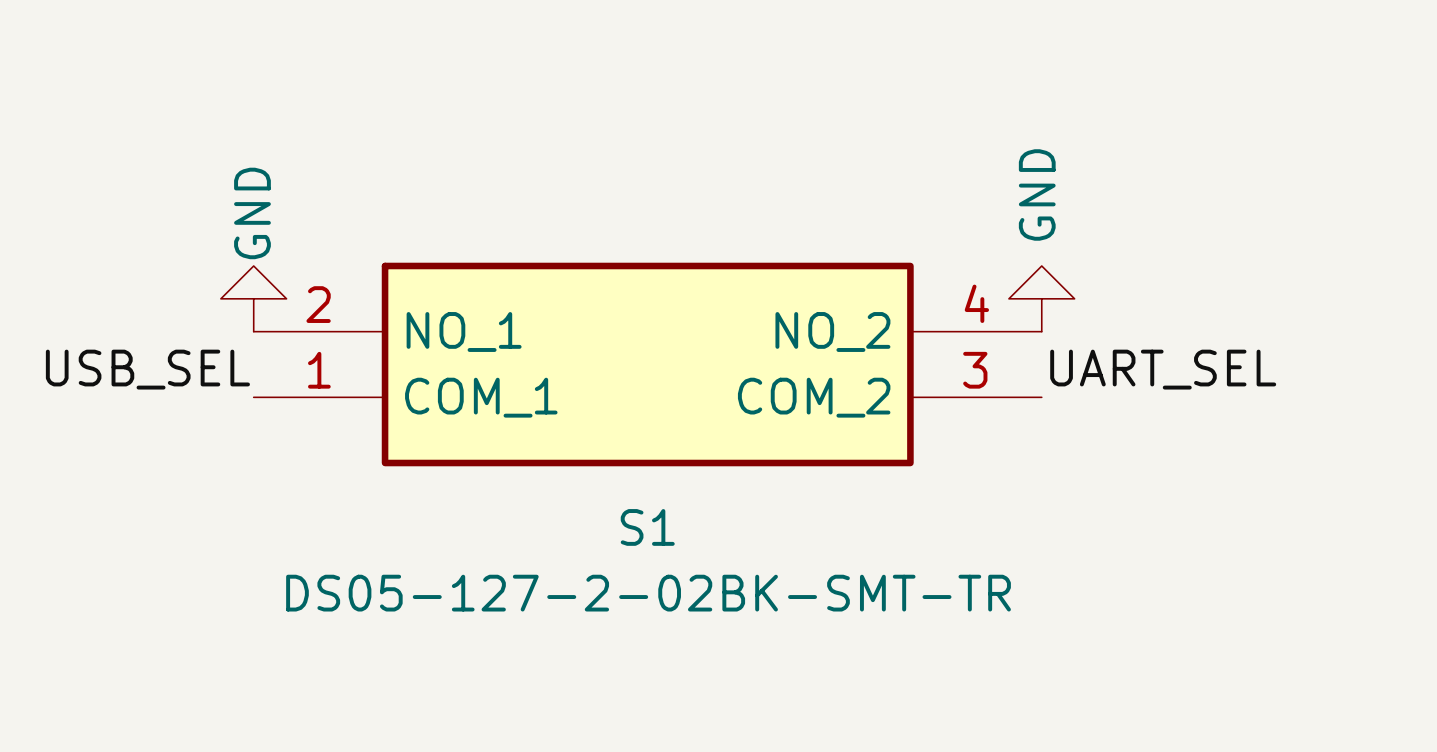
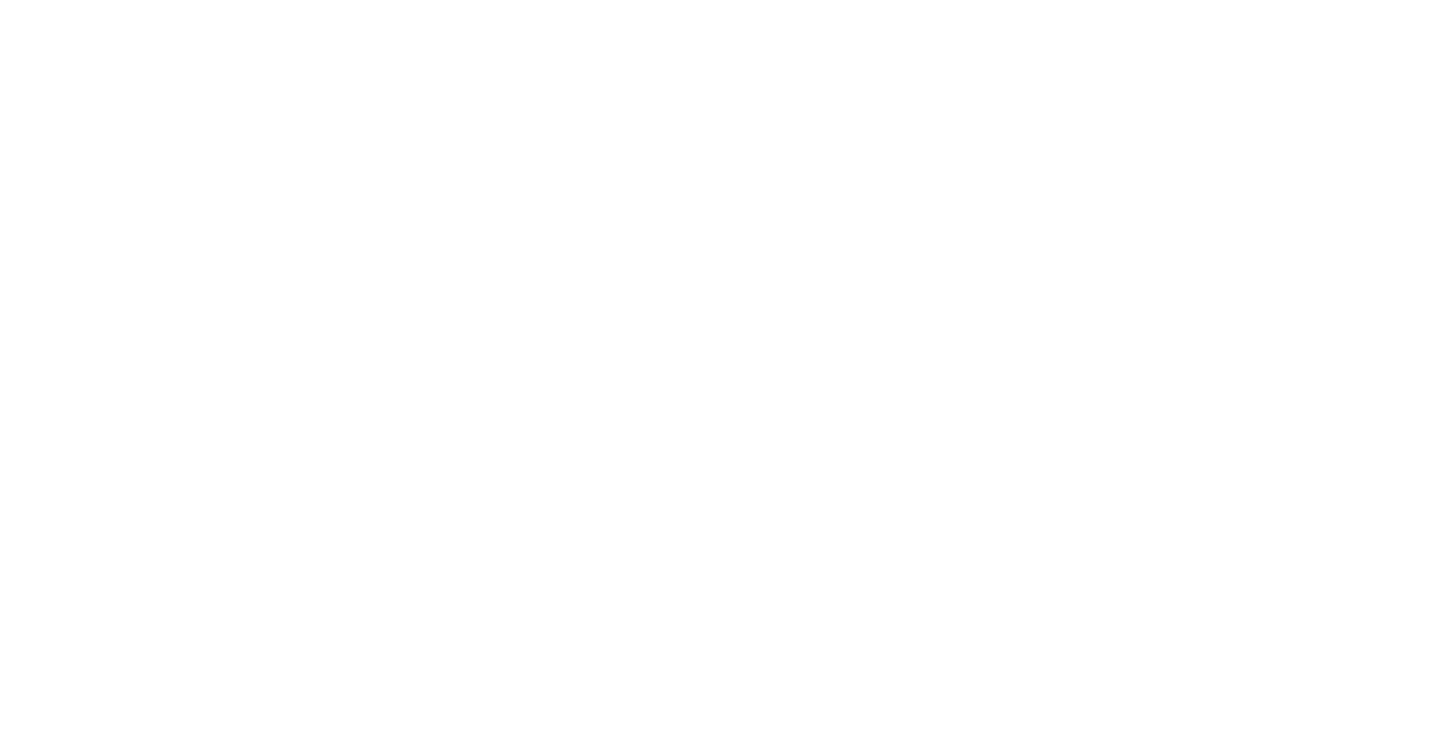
power symbol: GND (253, 298) -> none
power symbol: GND (1041, 298) -> none
S1: DS05-127-2-02BK-SMT-TR (647, 364) -> none
label: USB_SEL (147, 369) -> none
label: UART_SEL (1163, 369) -> none

